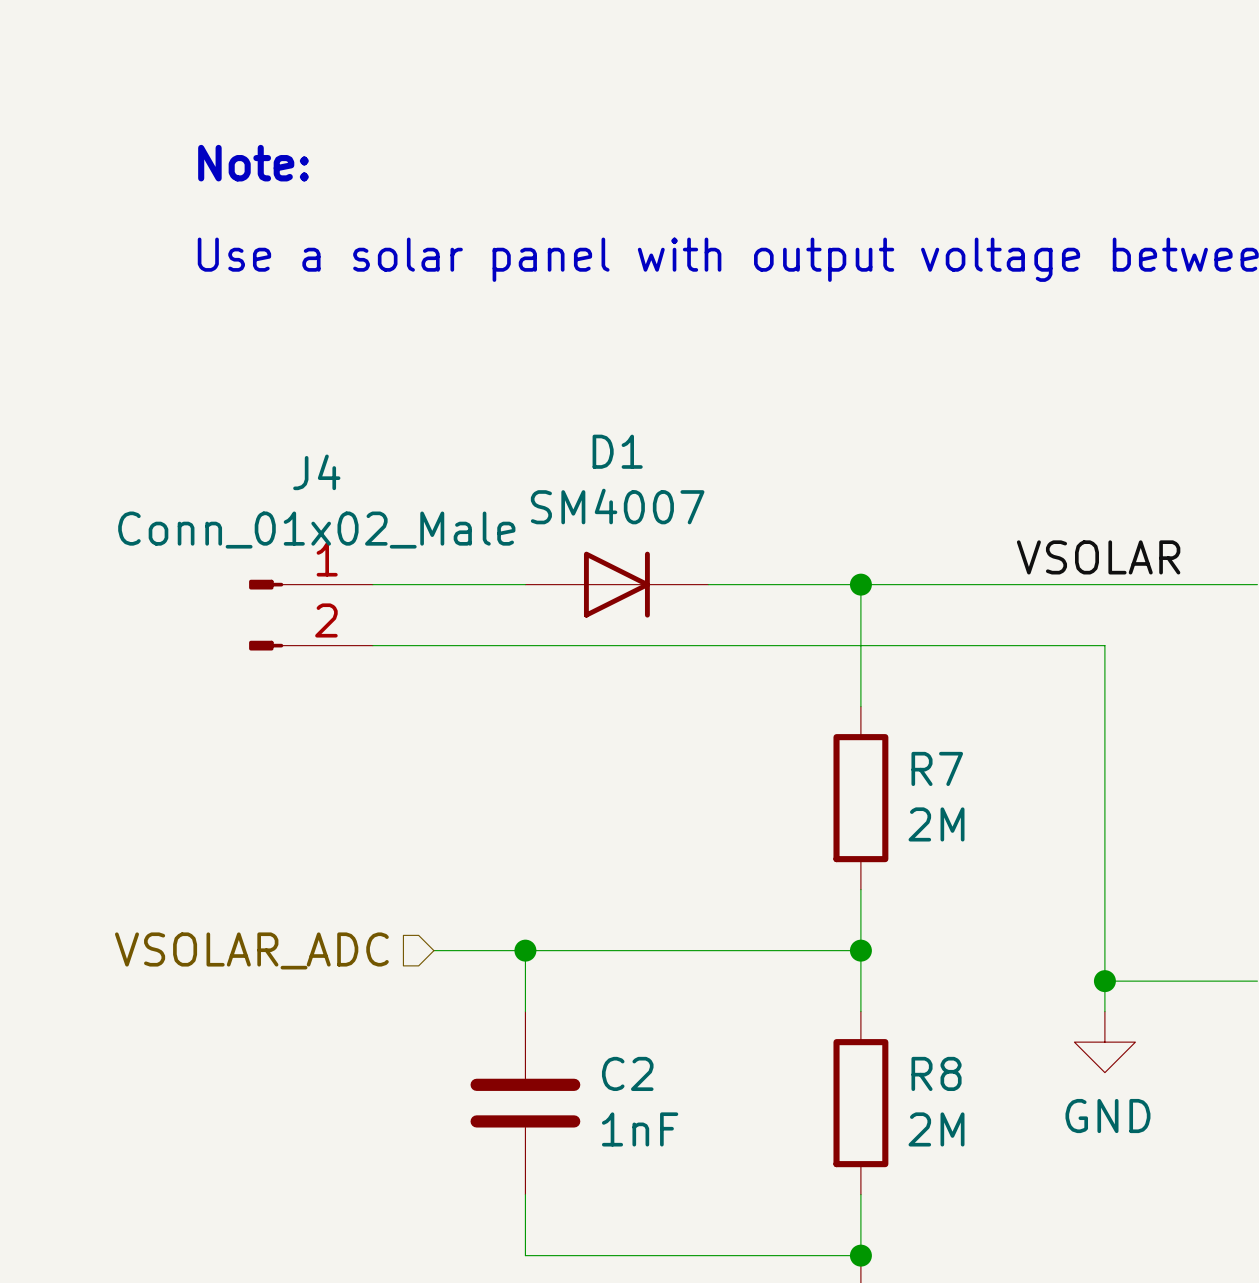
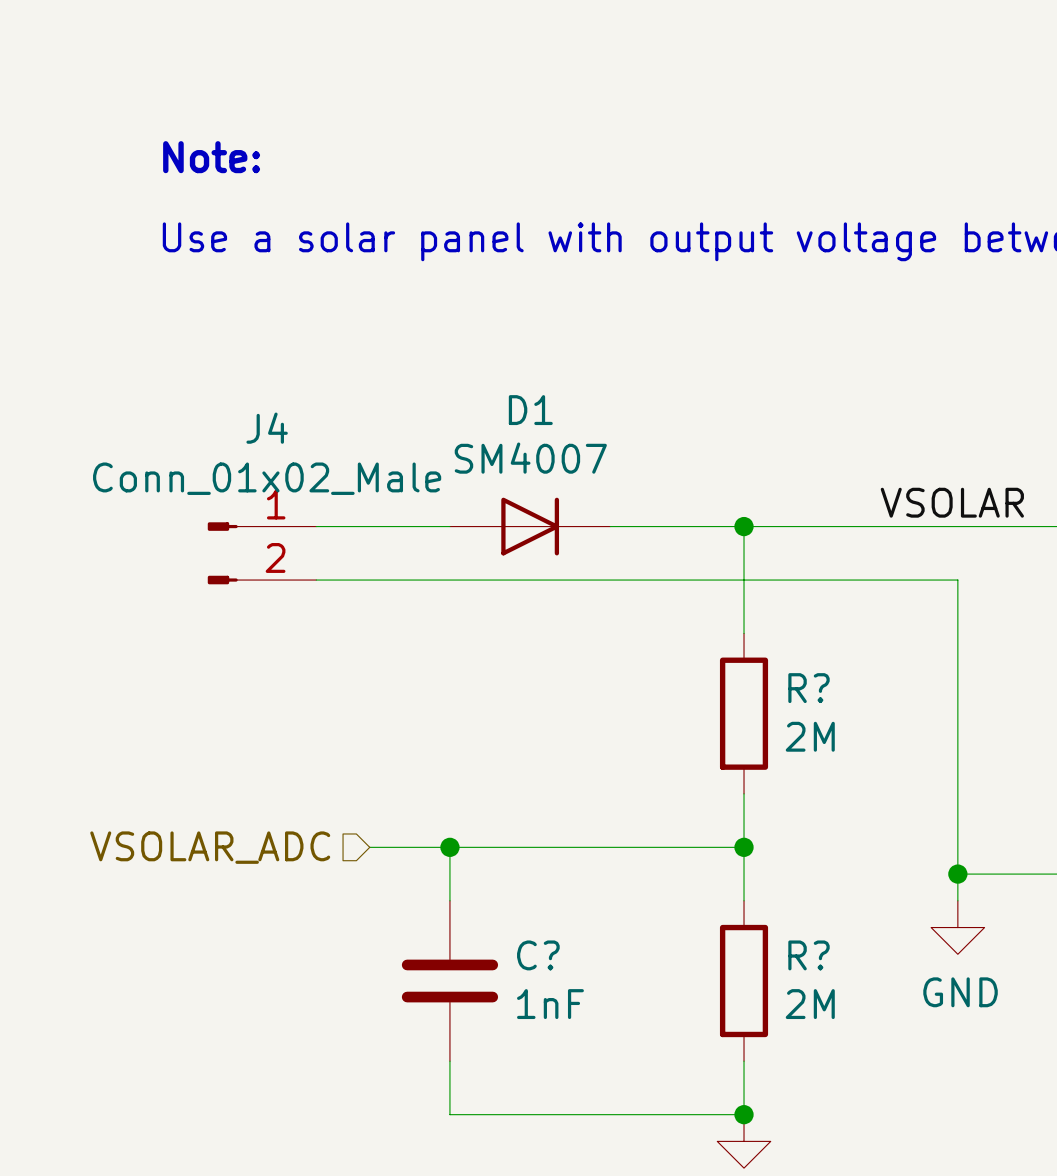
R7 name: R7 (937, 768) -> R? (809, 688)
C2 name: C2 (627, 1073) -> C? (538, 955)
R8 name: R8 (936, 1073) -> R? (809, 955)

